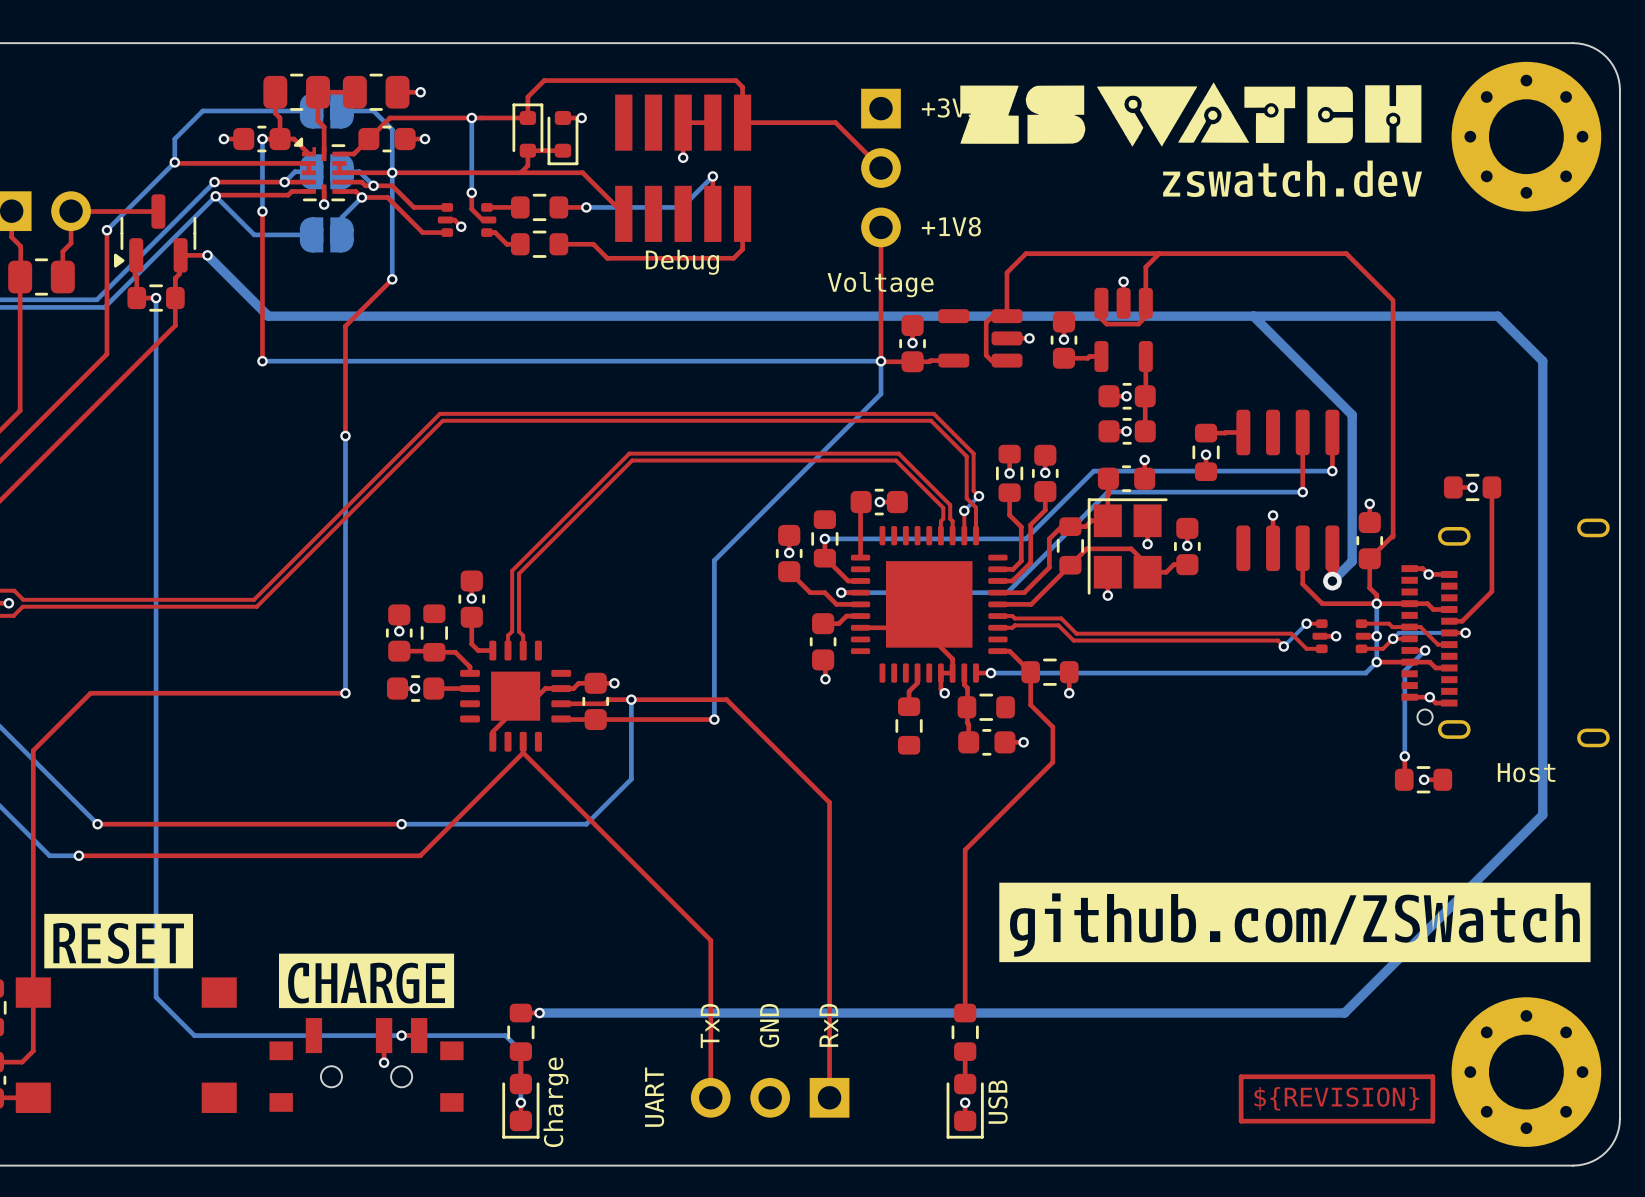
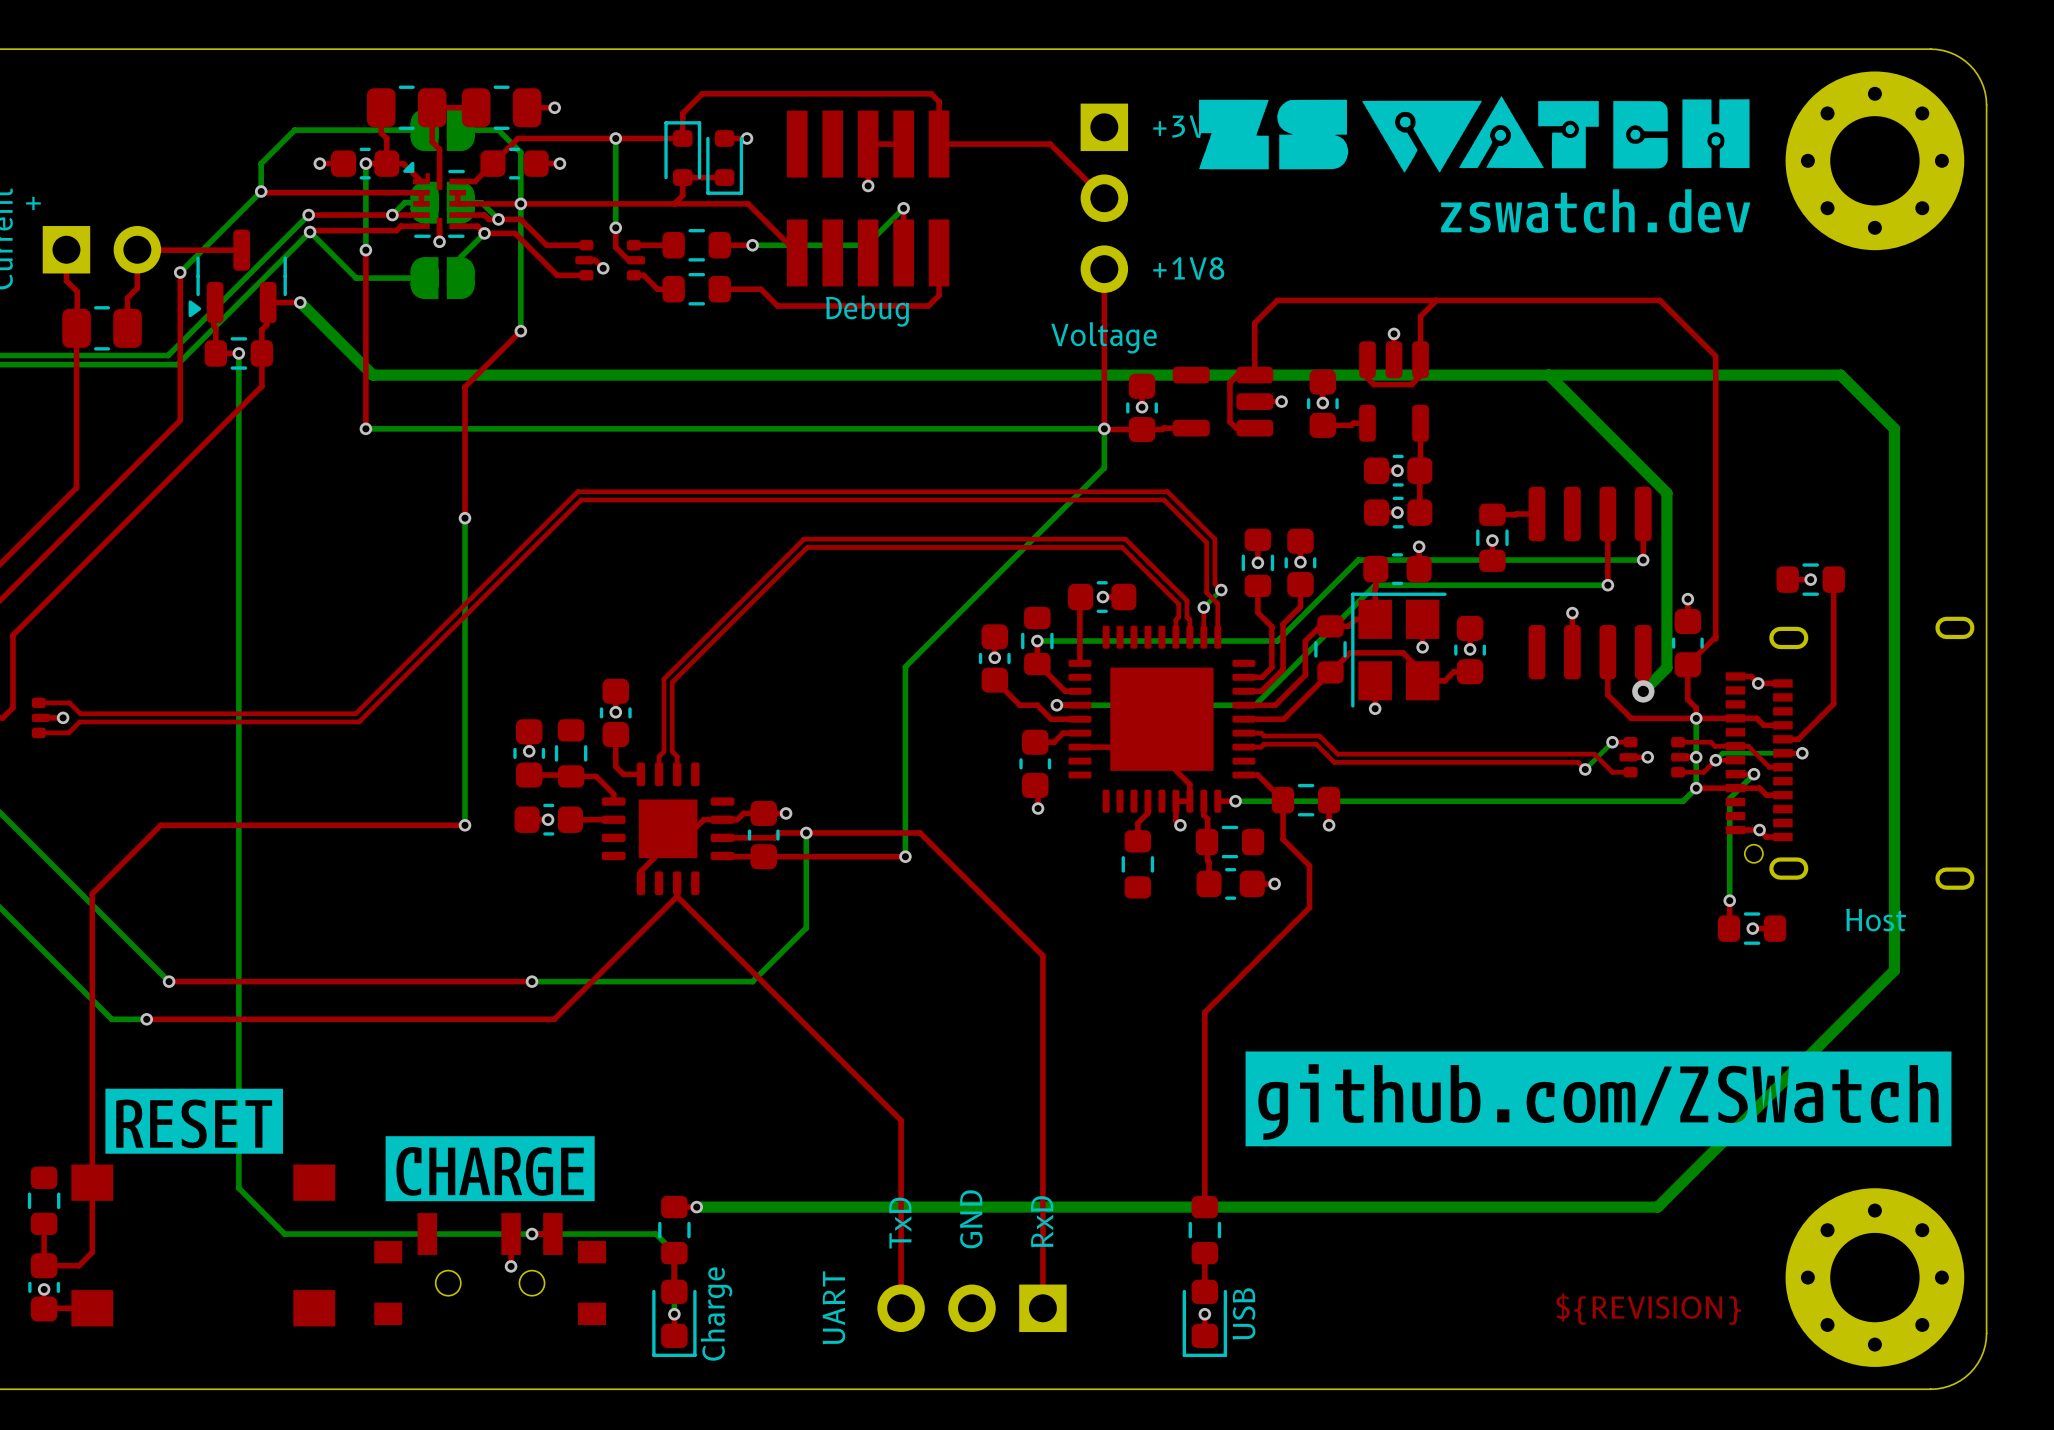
top track: (1241, 1076) (1432, 1076) (1432, 1121) (1241, 1121) (1241, 1076) -> none

